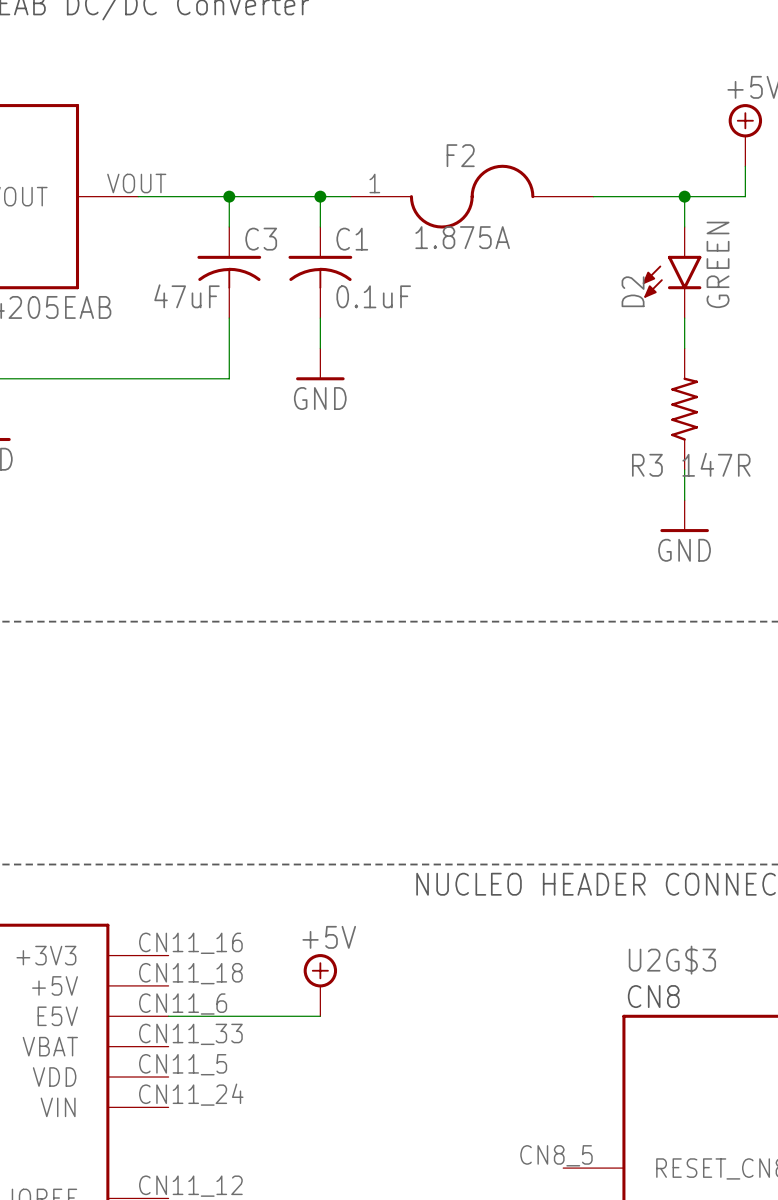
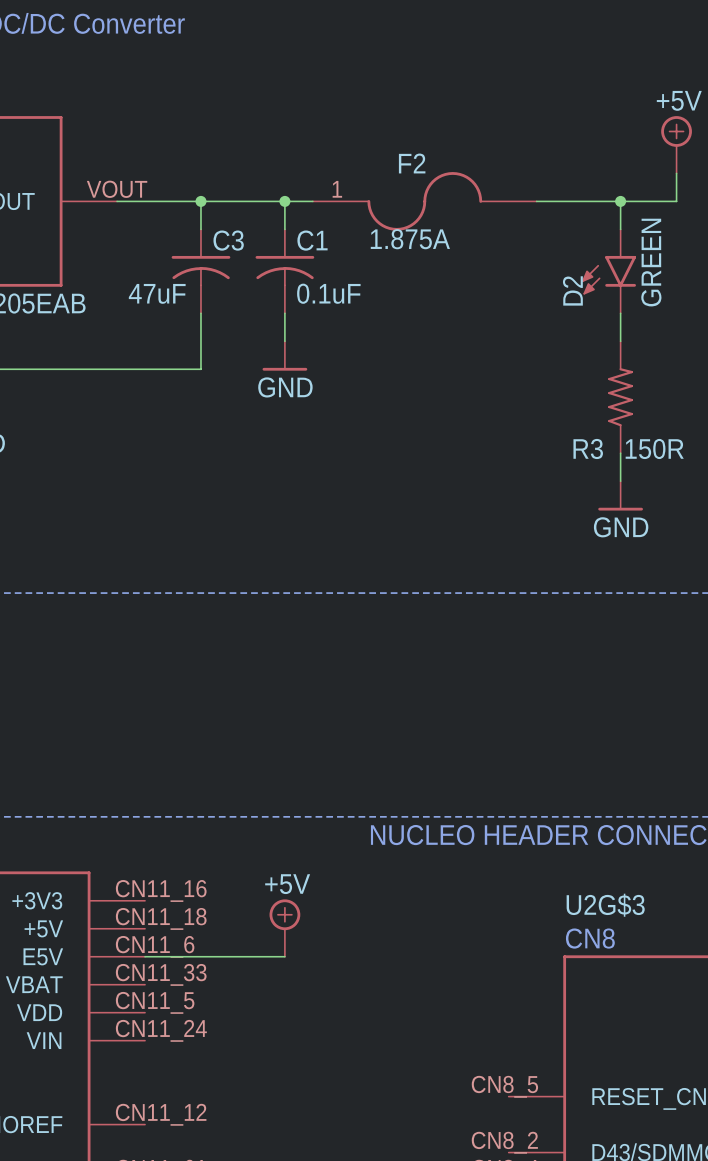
R3 value: 147R (716, 464) -> 150R (654, 448)

